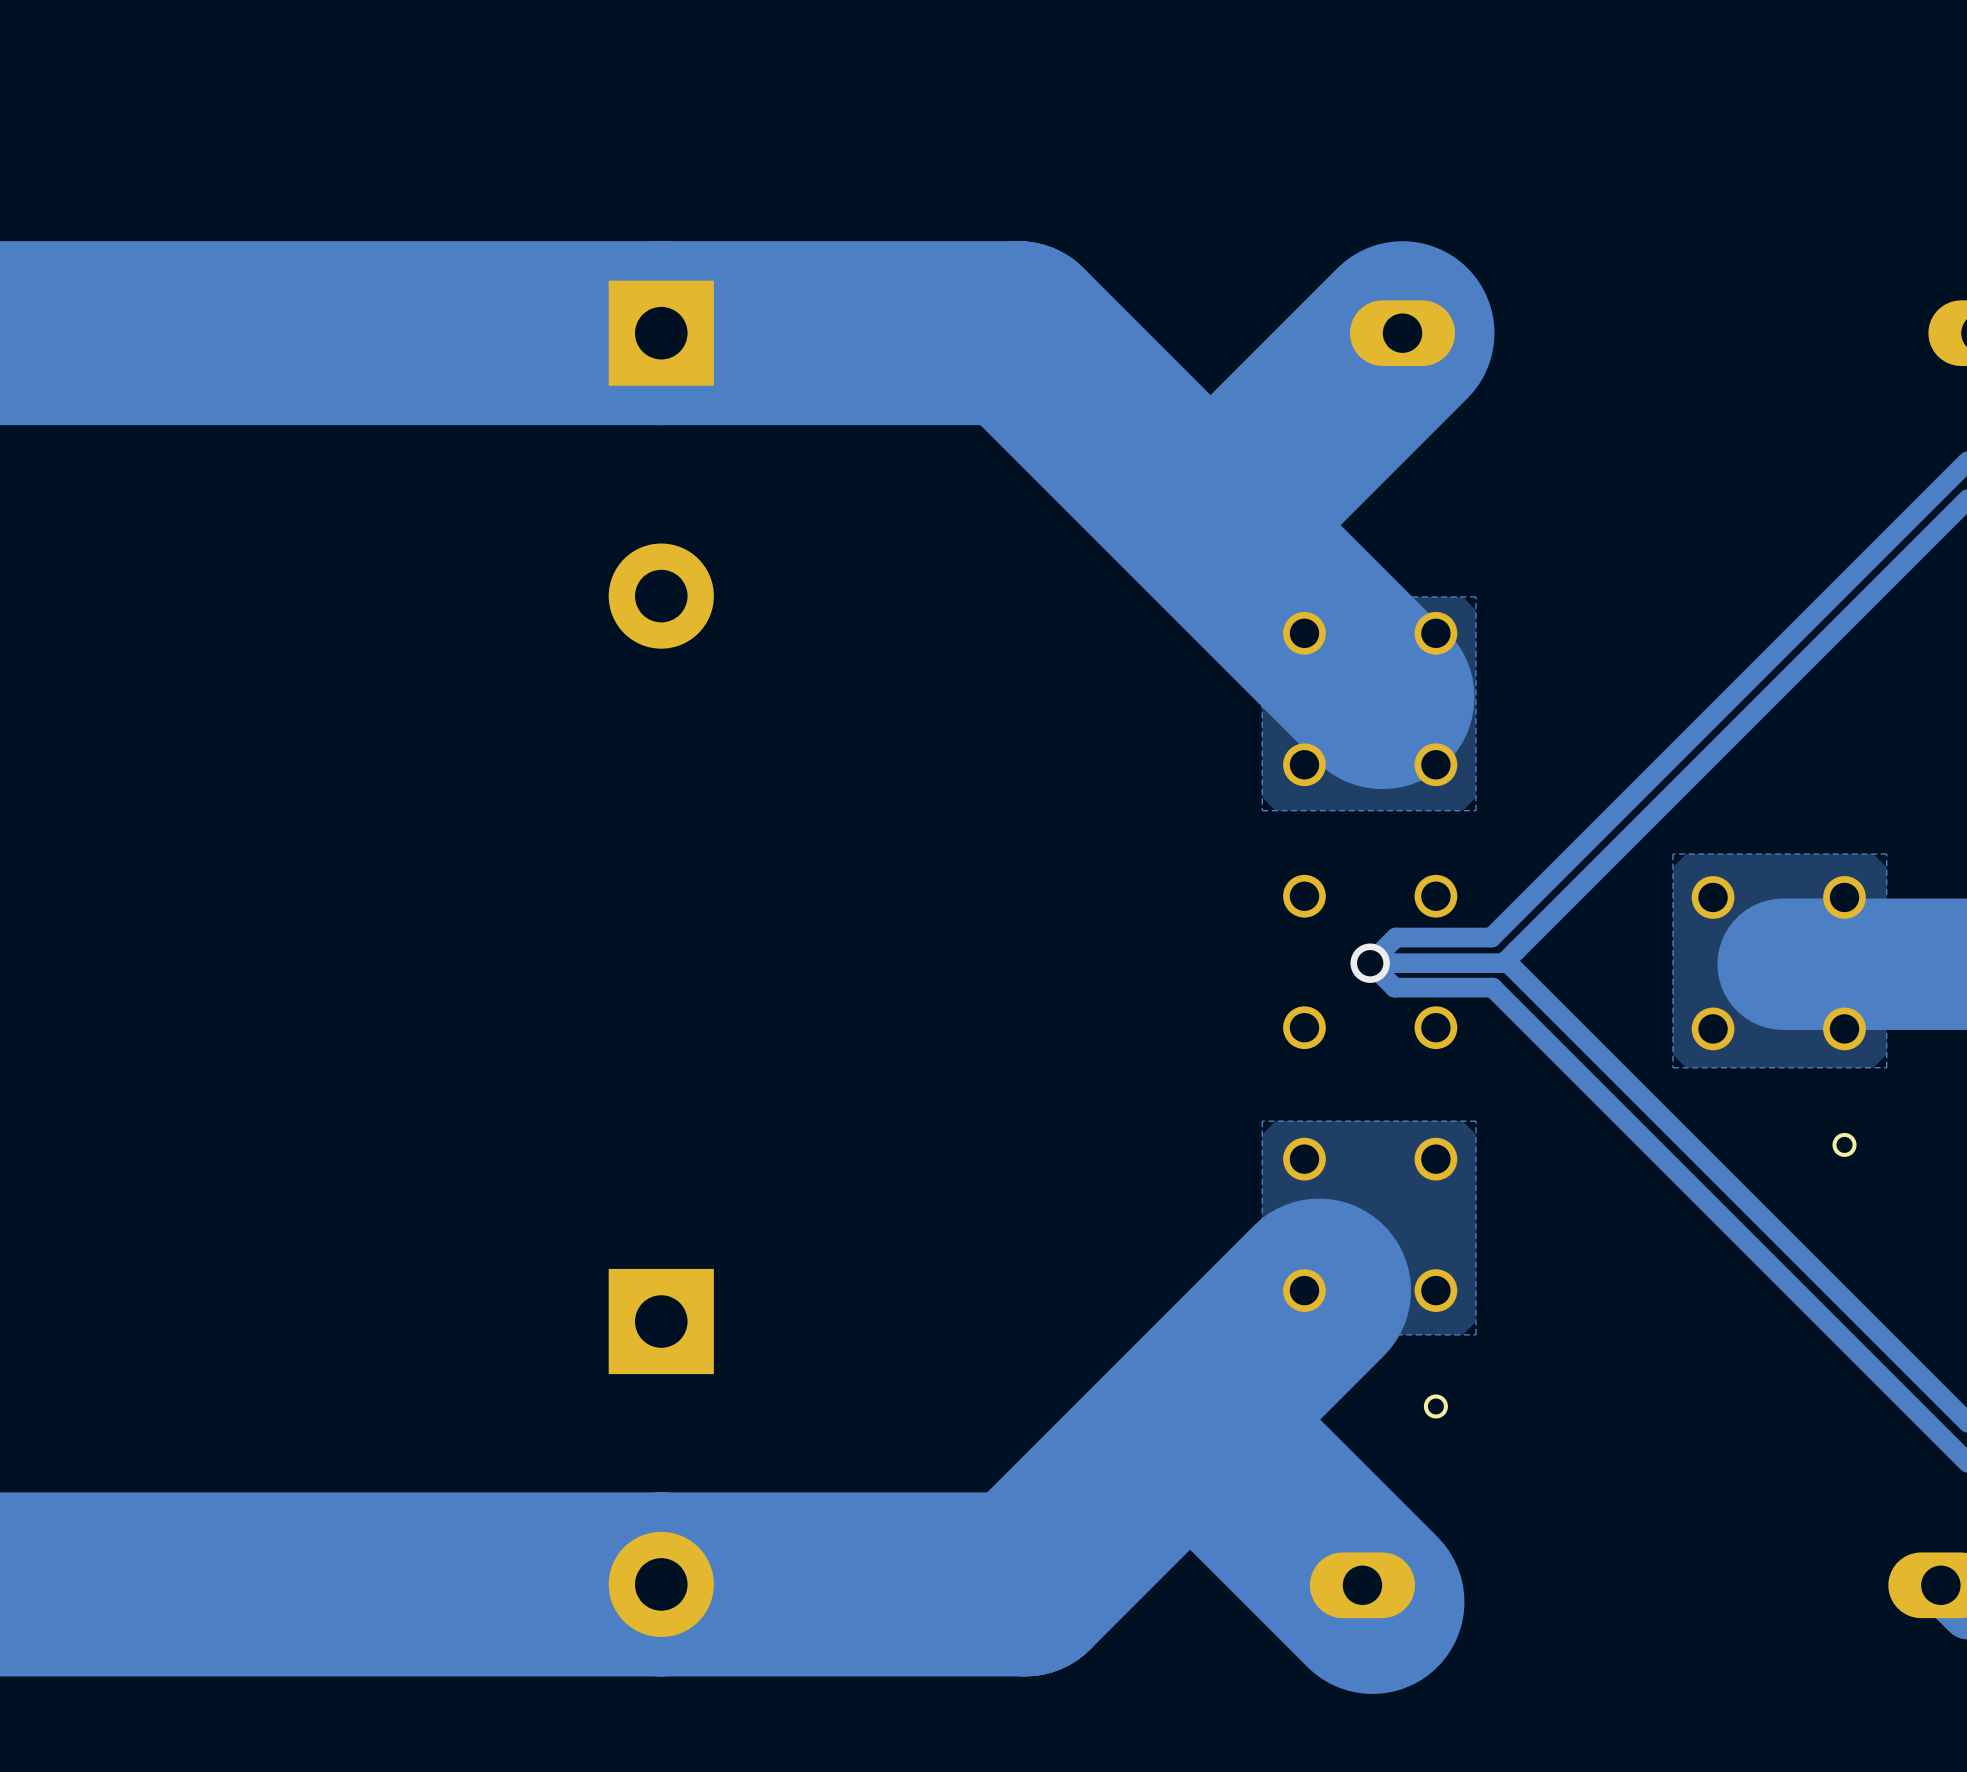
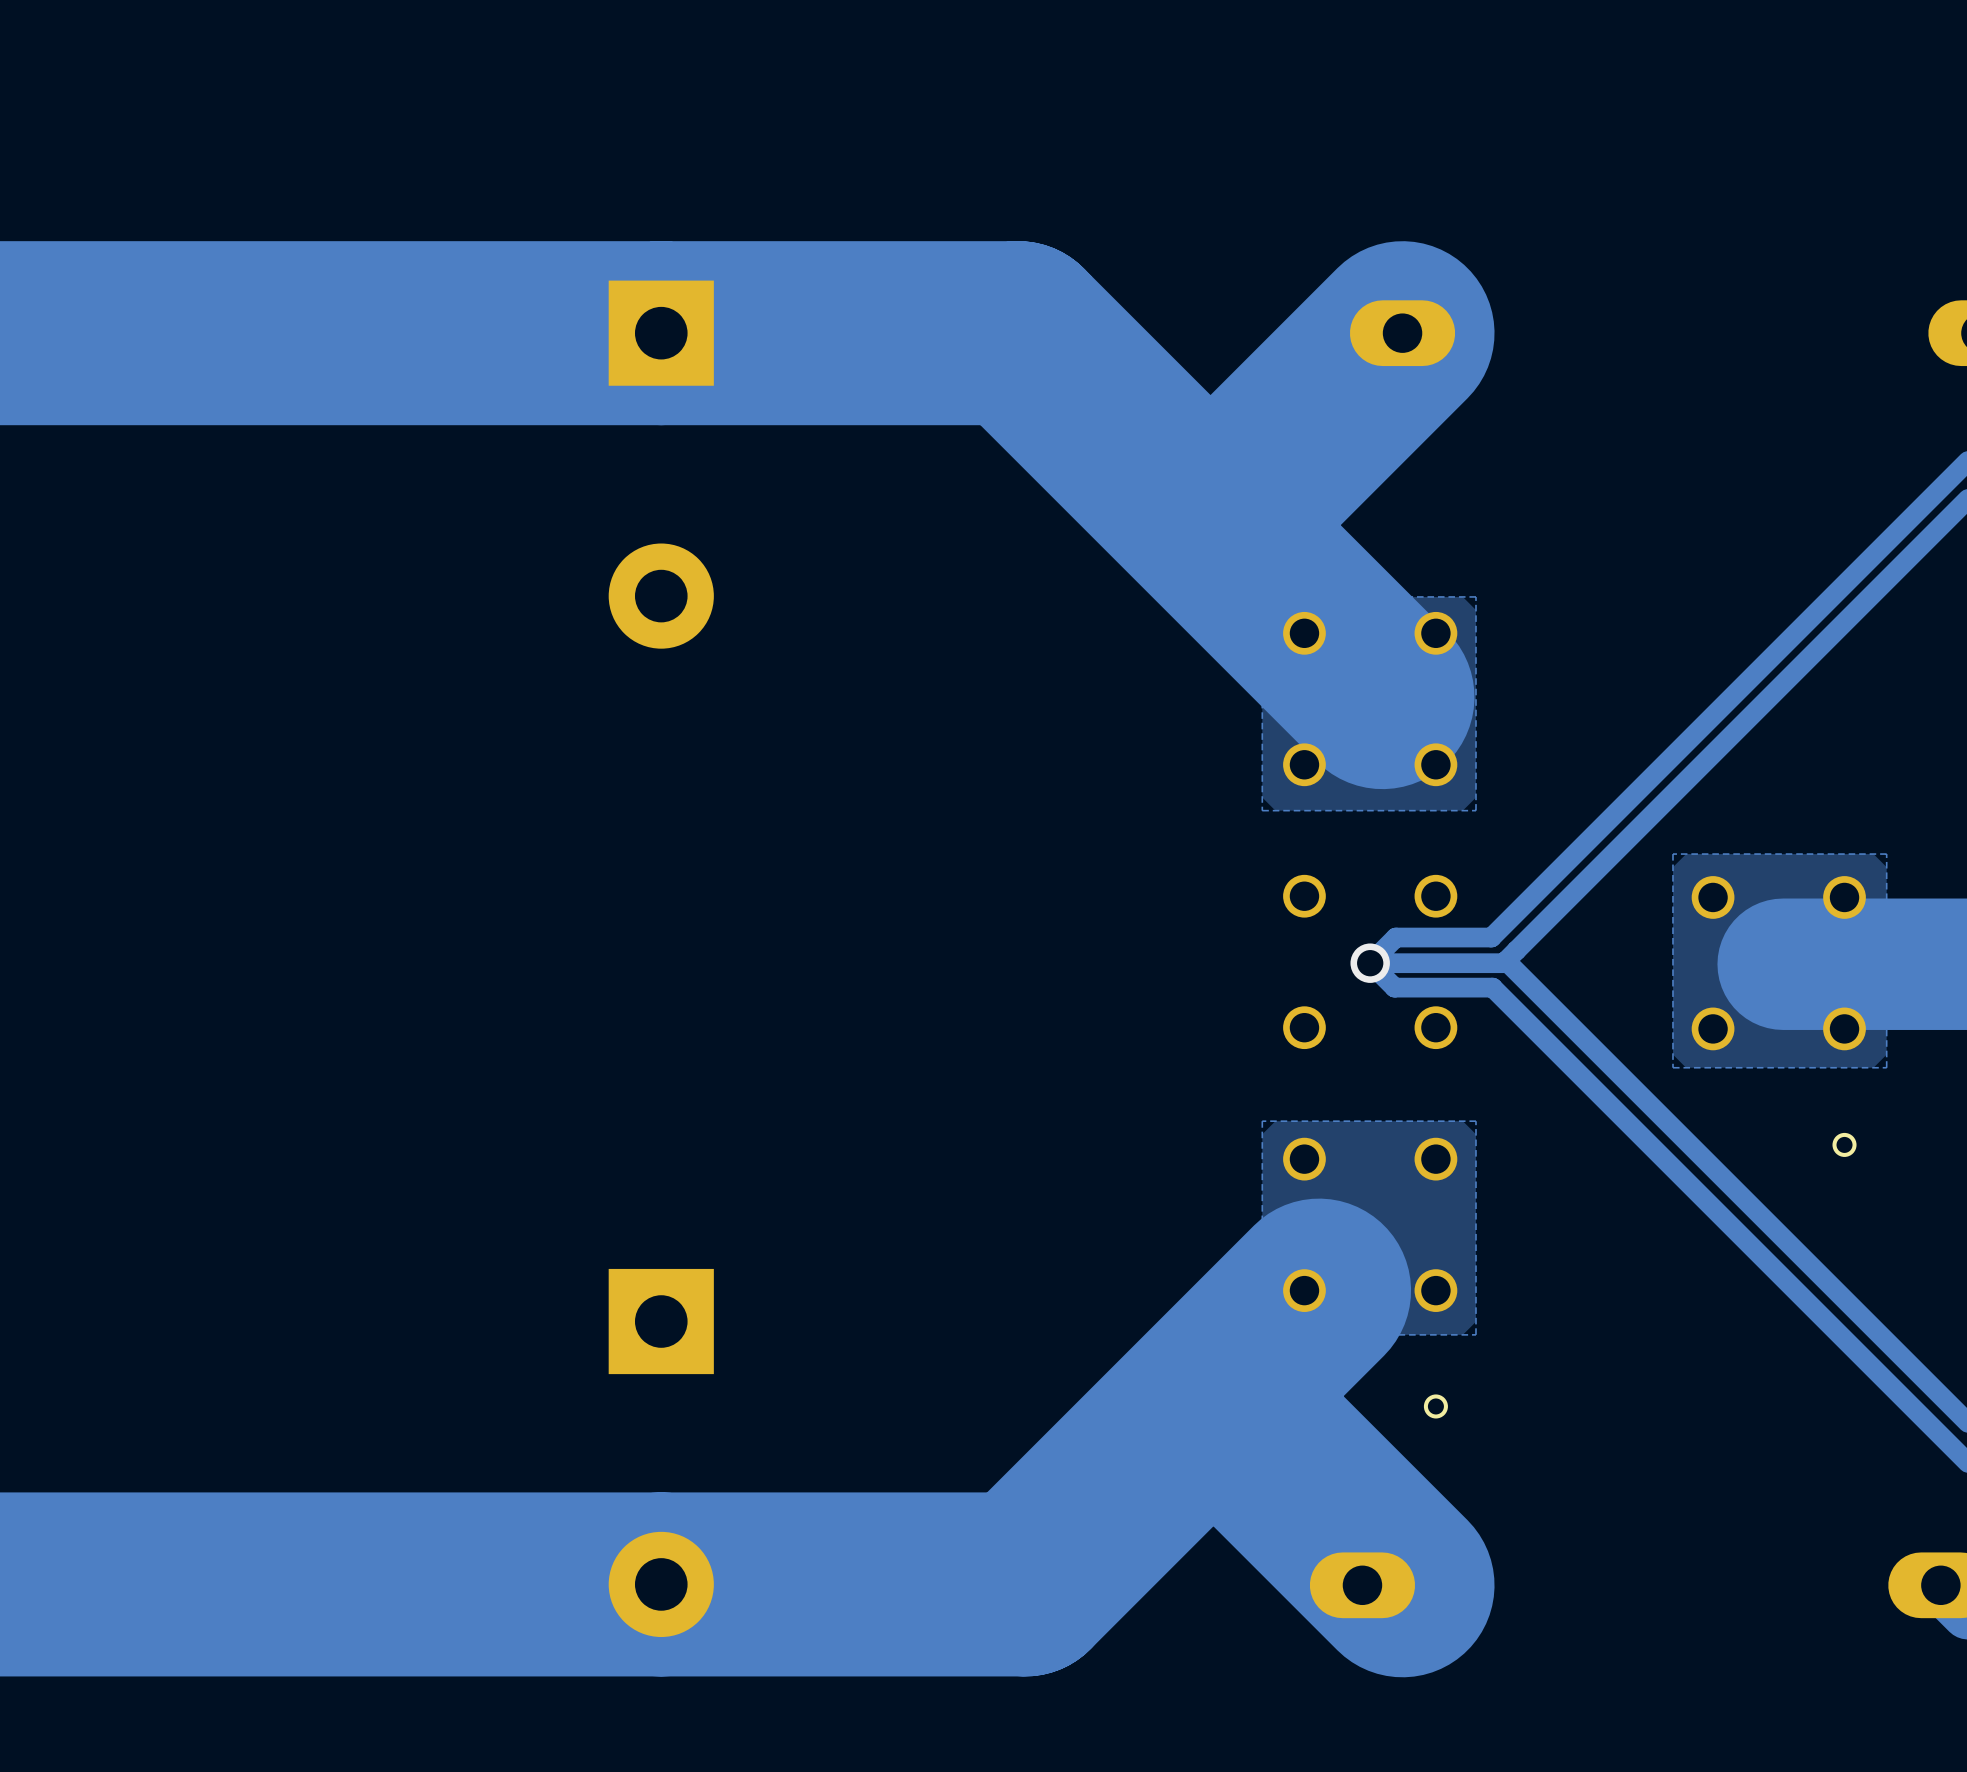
track: (1192, 1421) (1372, 1601) -> (1222, 1404) (1402, 1585)

